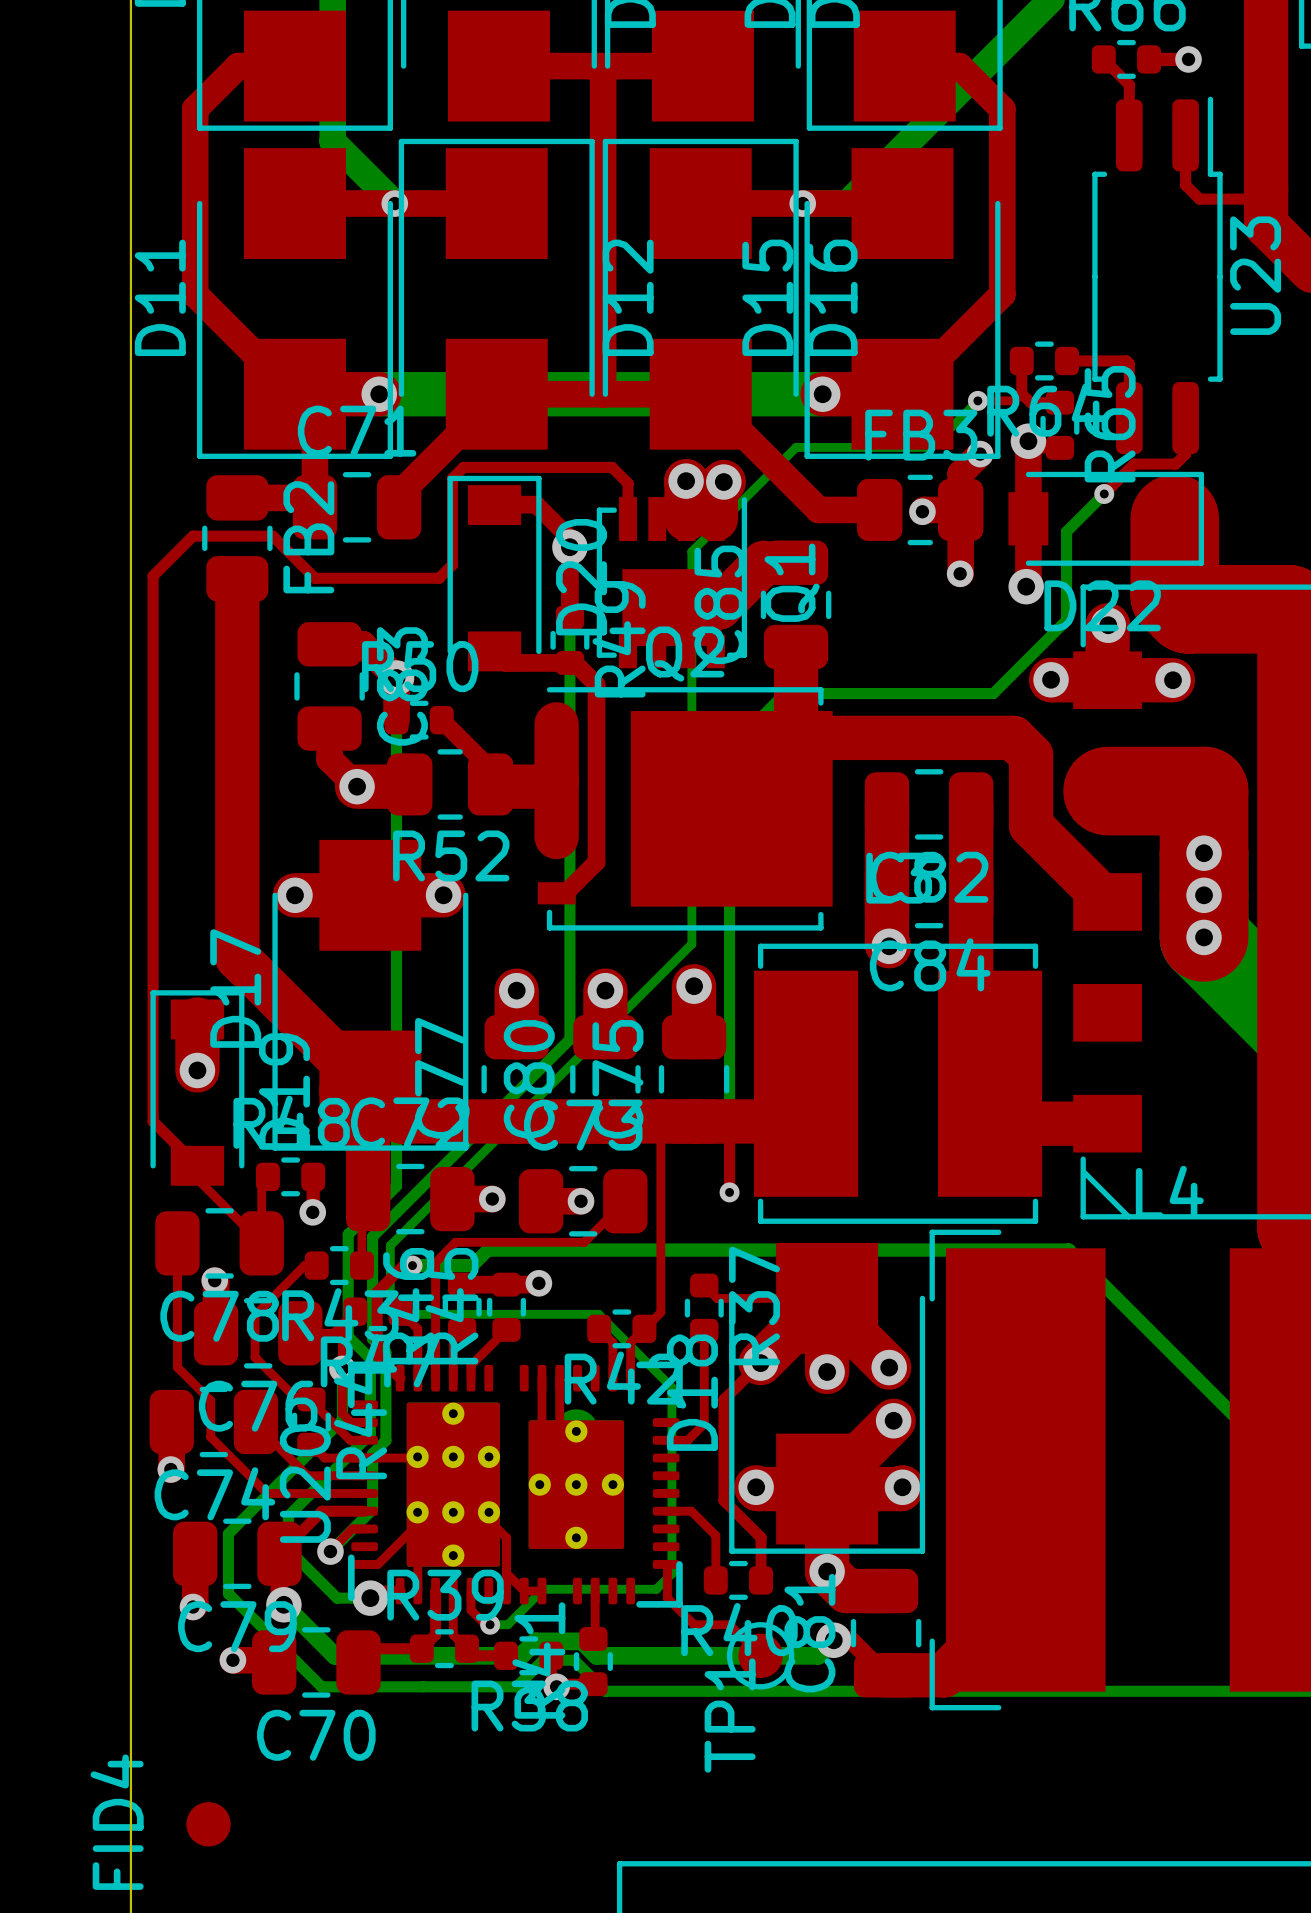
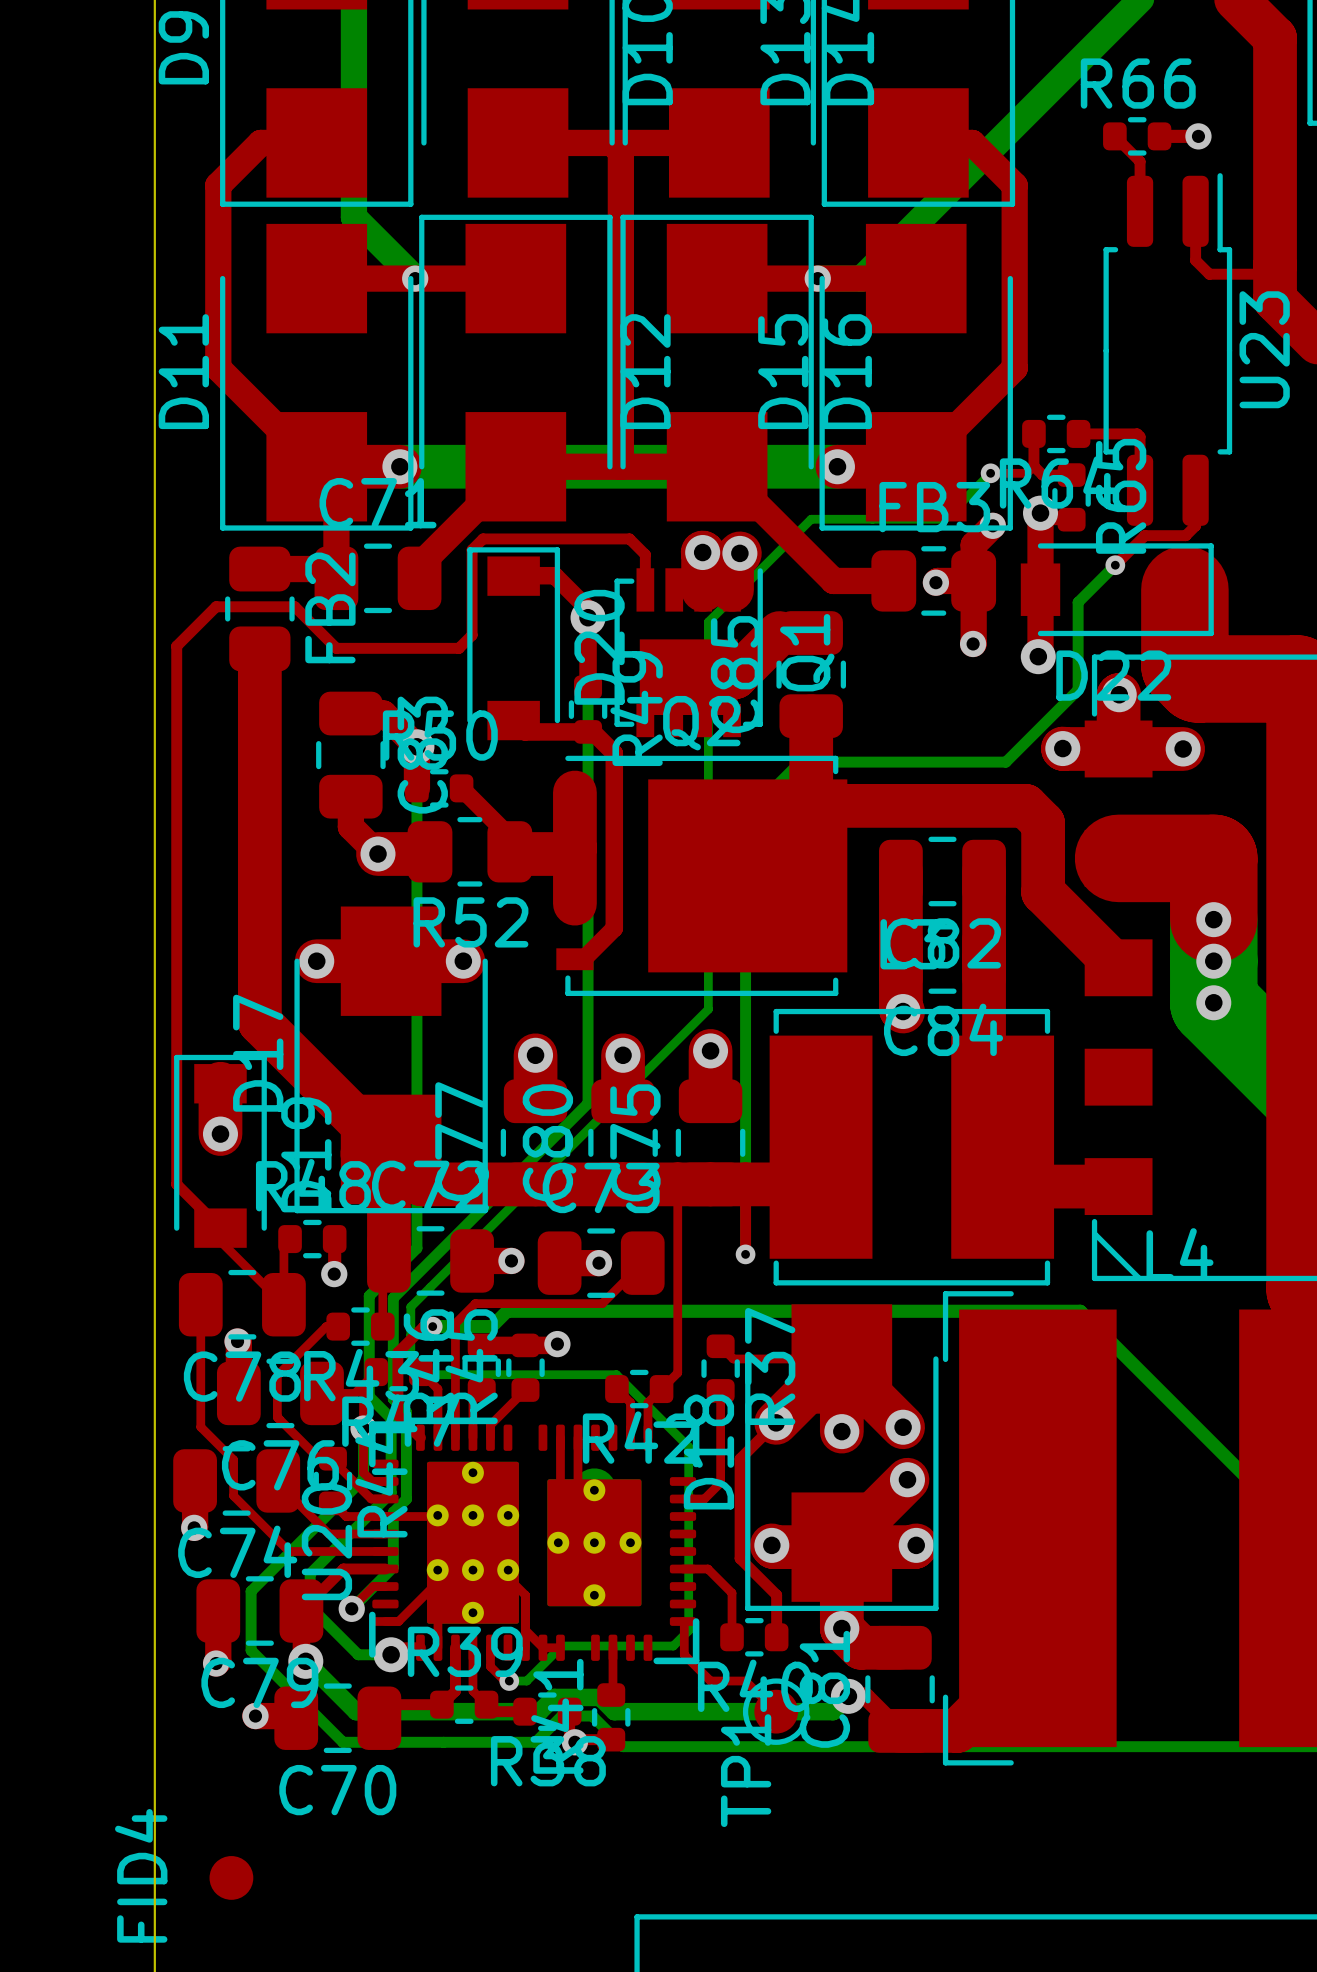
top track: (1204, 853) (1204, 937) -> none

